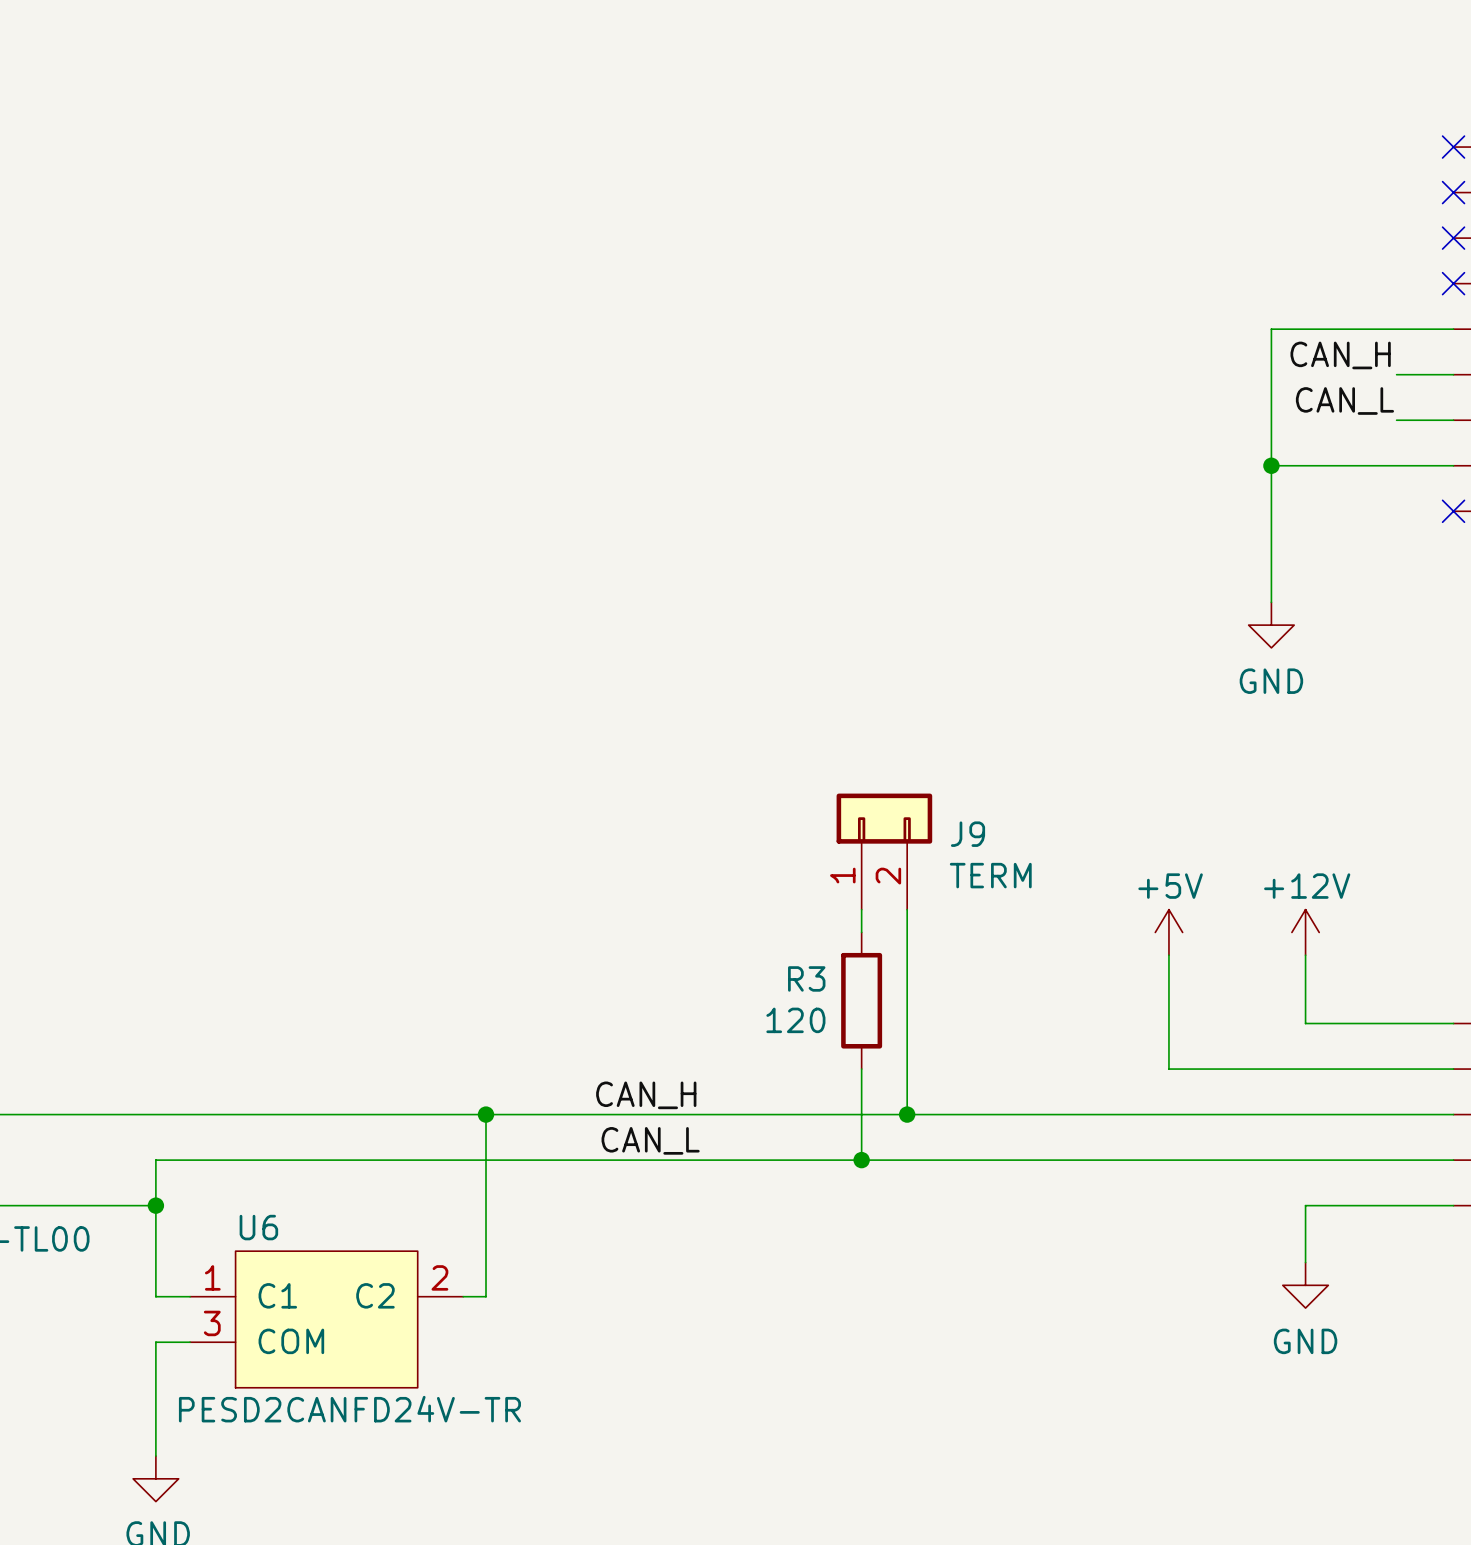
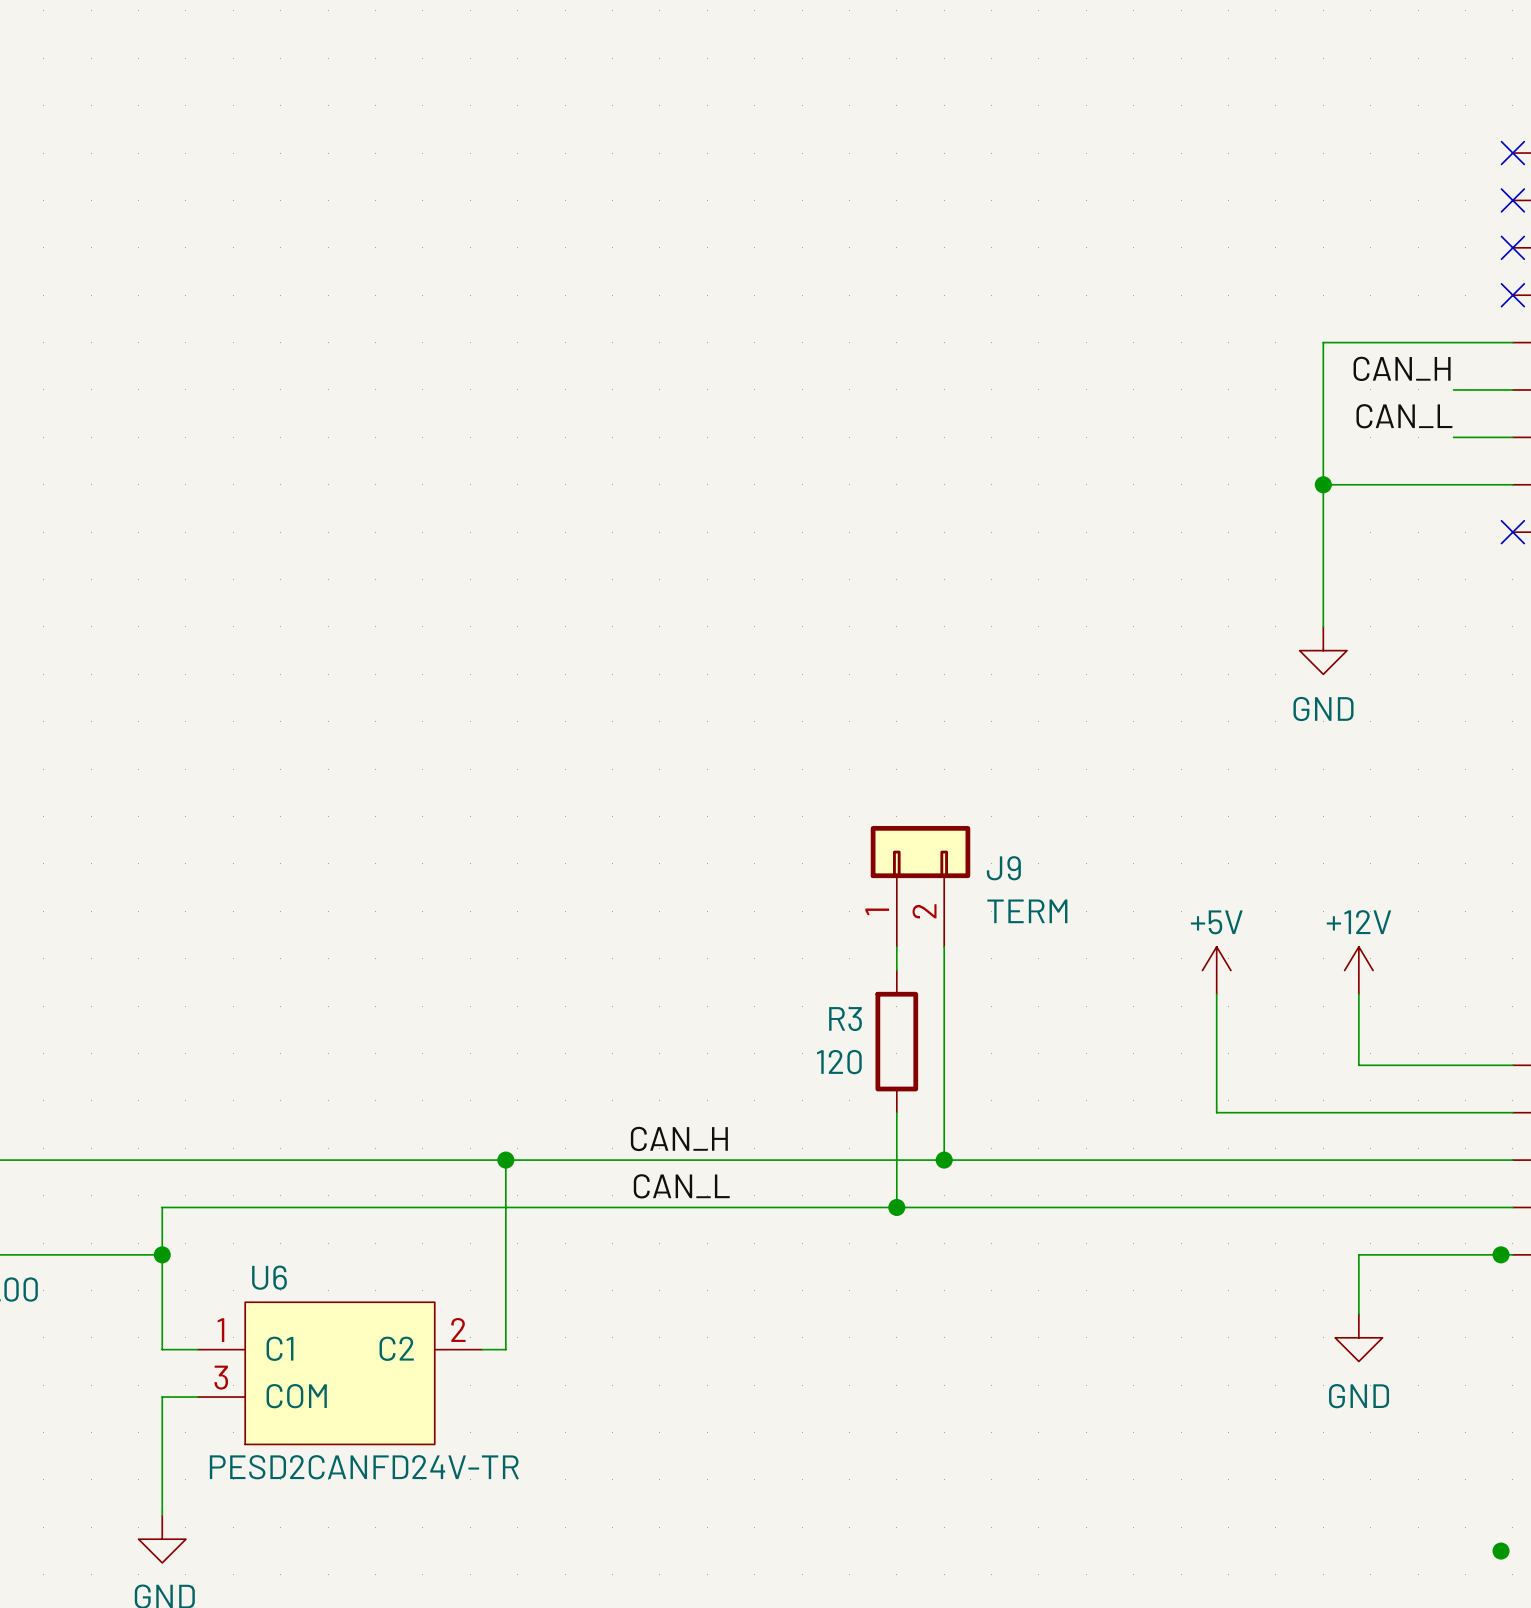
junction: none -> (1501, 1254)
junction: none -> (1501, 1551)

